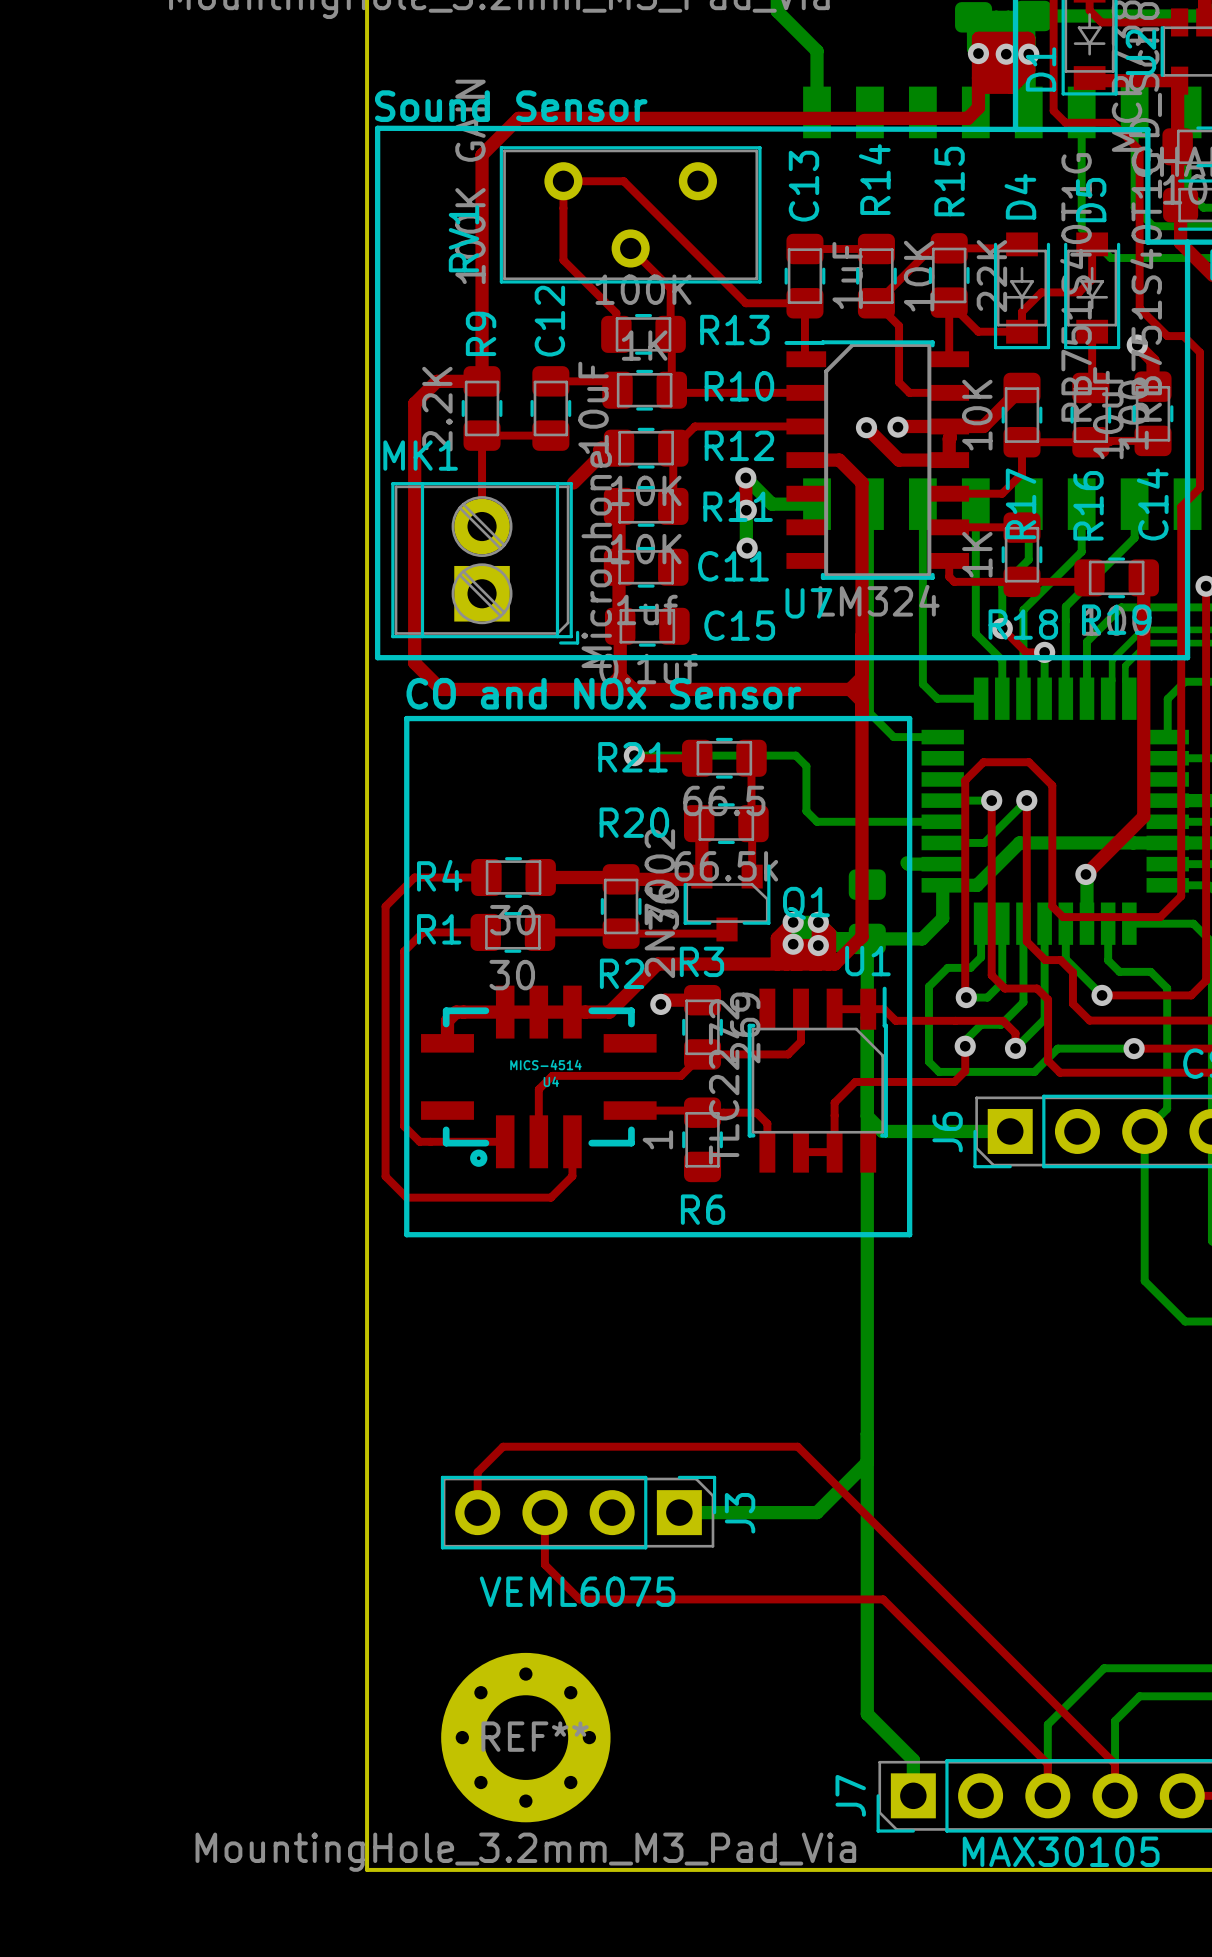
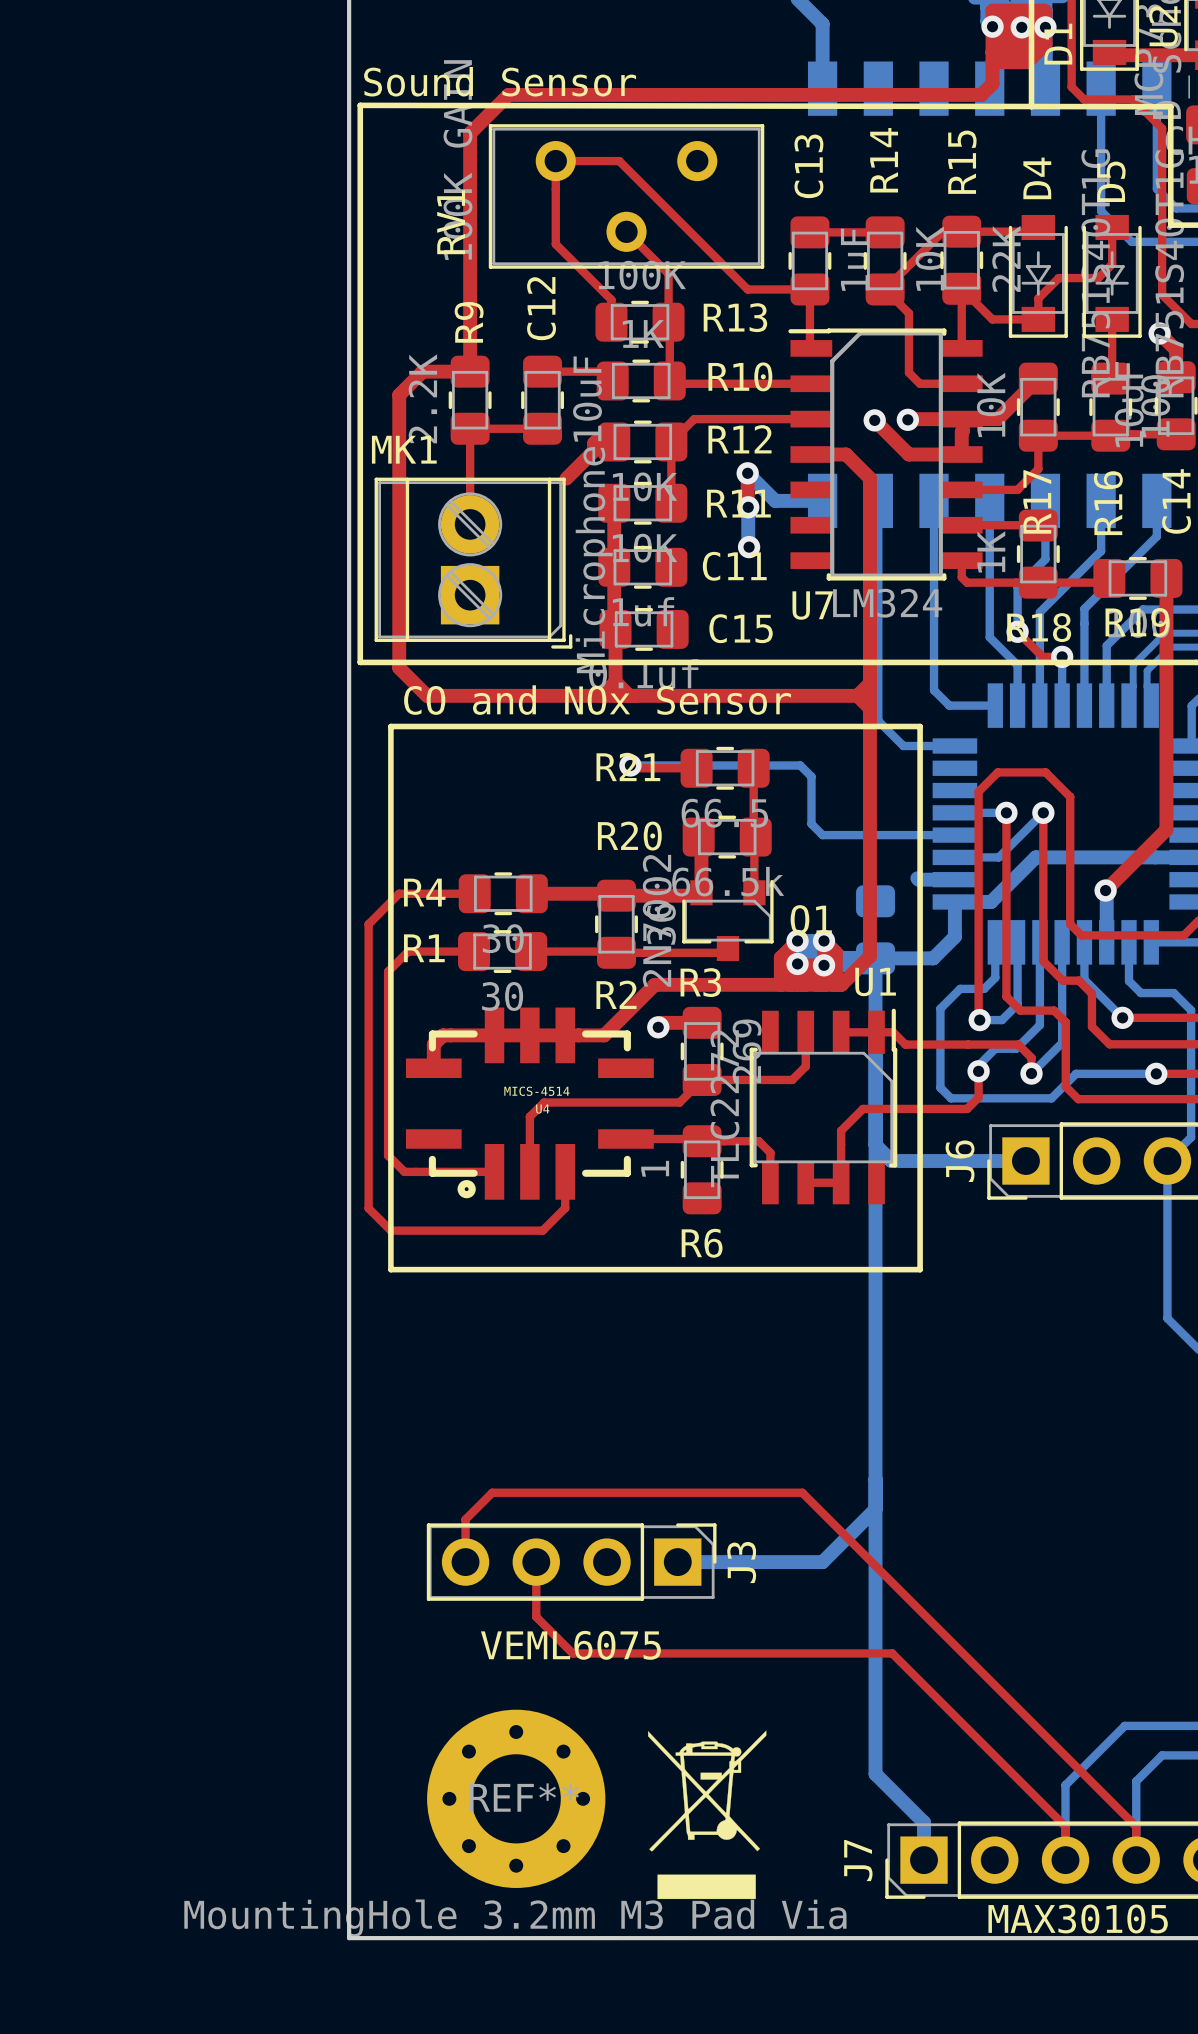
drawing: none -> [648, 1730, 767, 1900]

